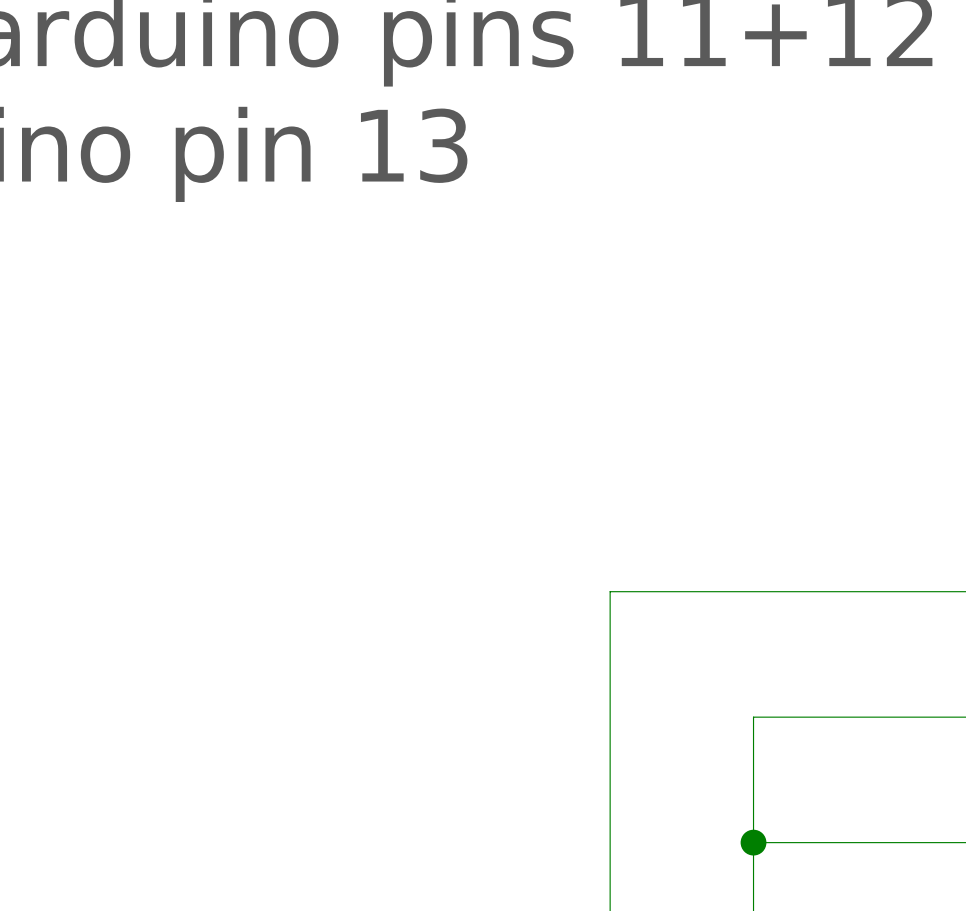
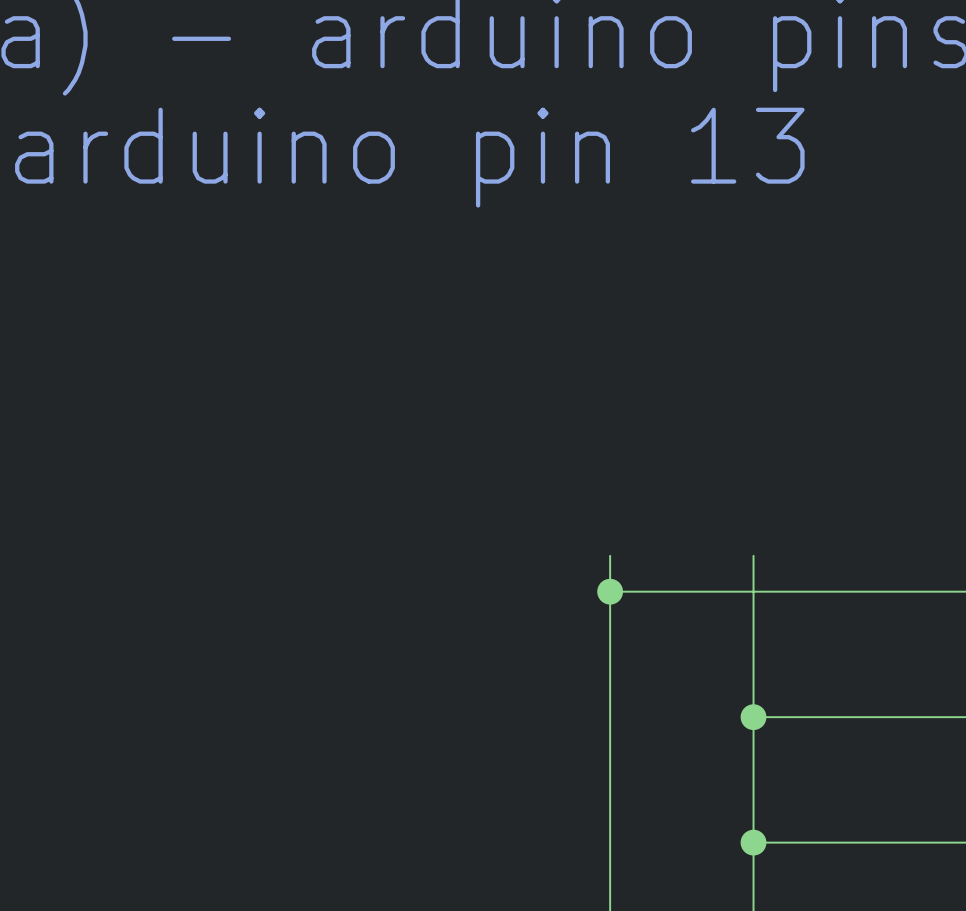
wire: none -> (610, 555) (610, 591)
wire: none -> (753, 555) (753, 717)
junction: none -> (610, 591)
junction: none -> (753, 717)

